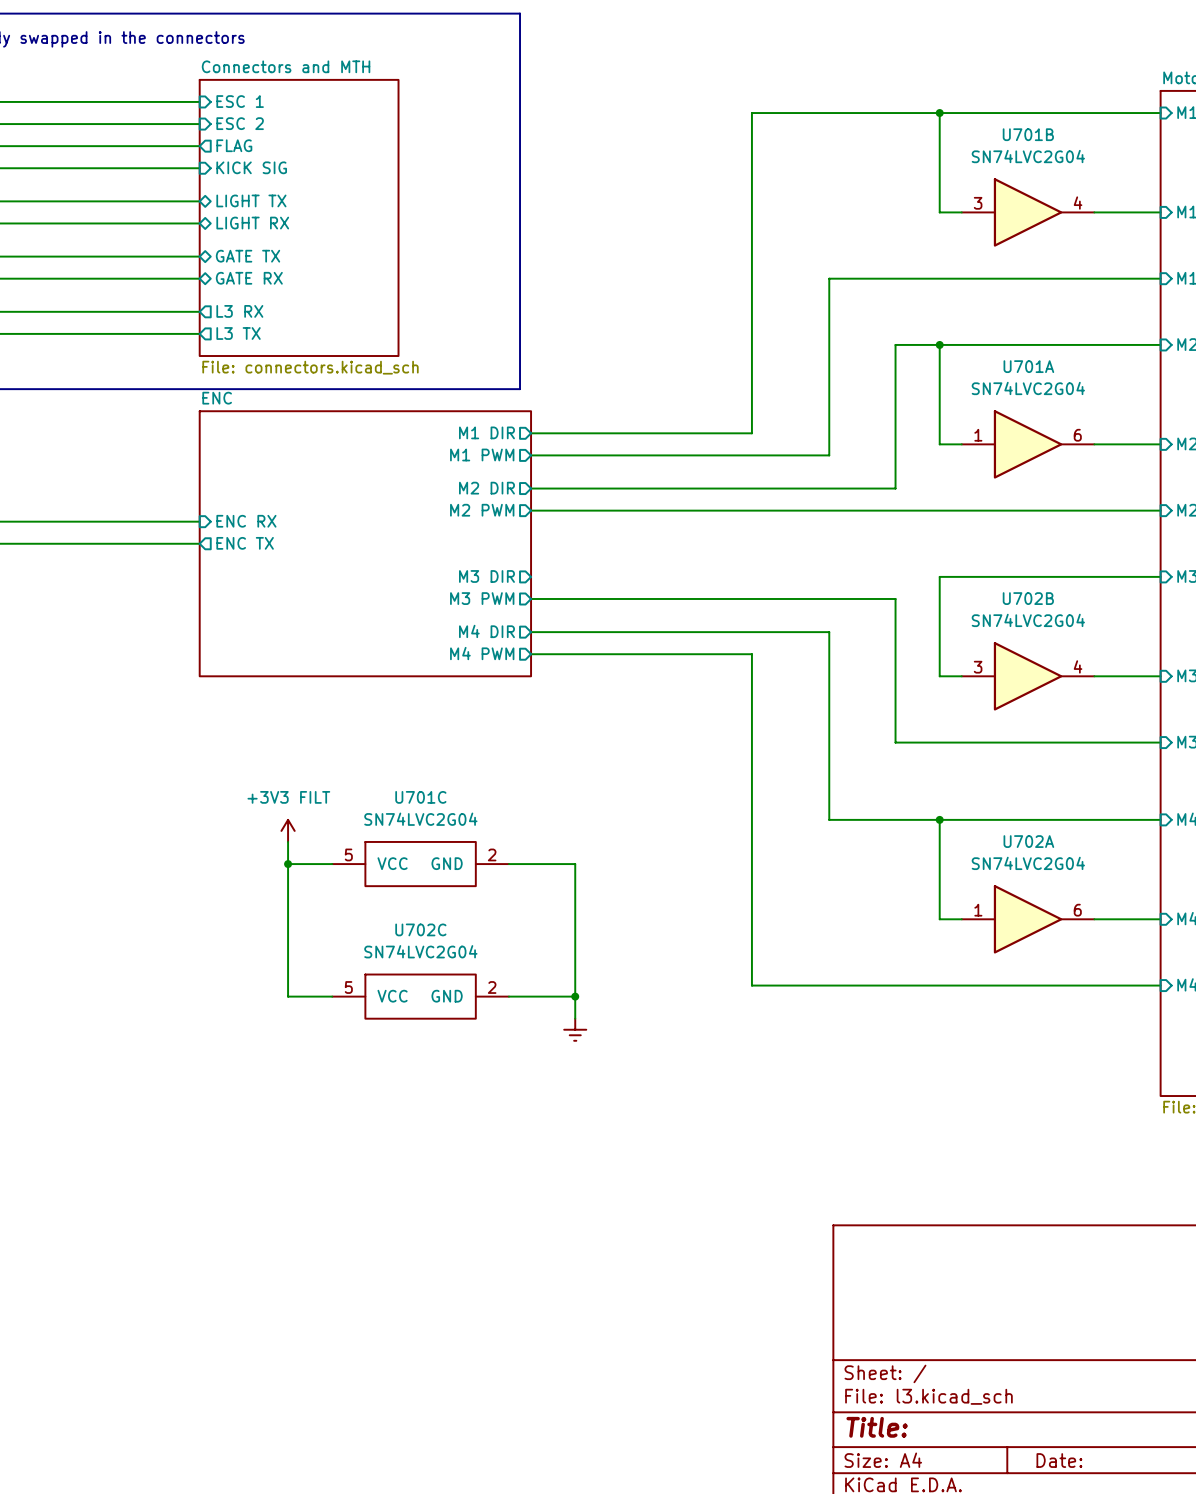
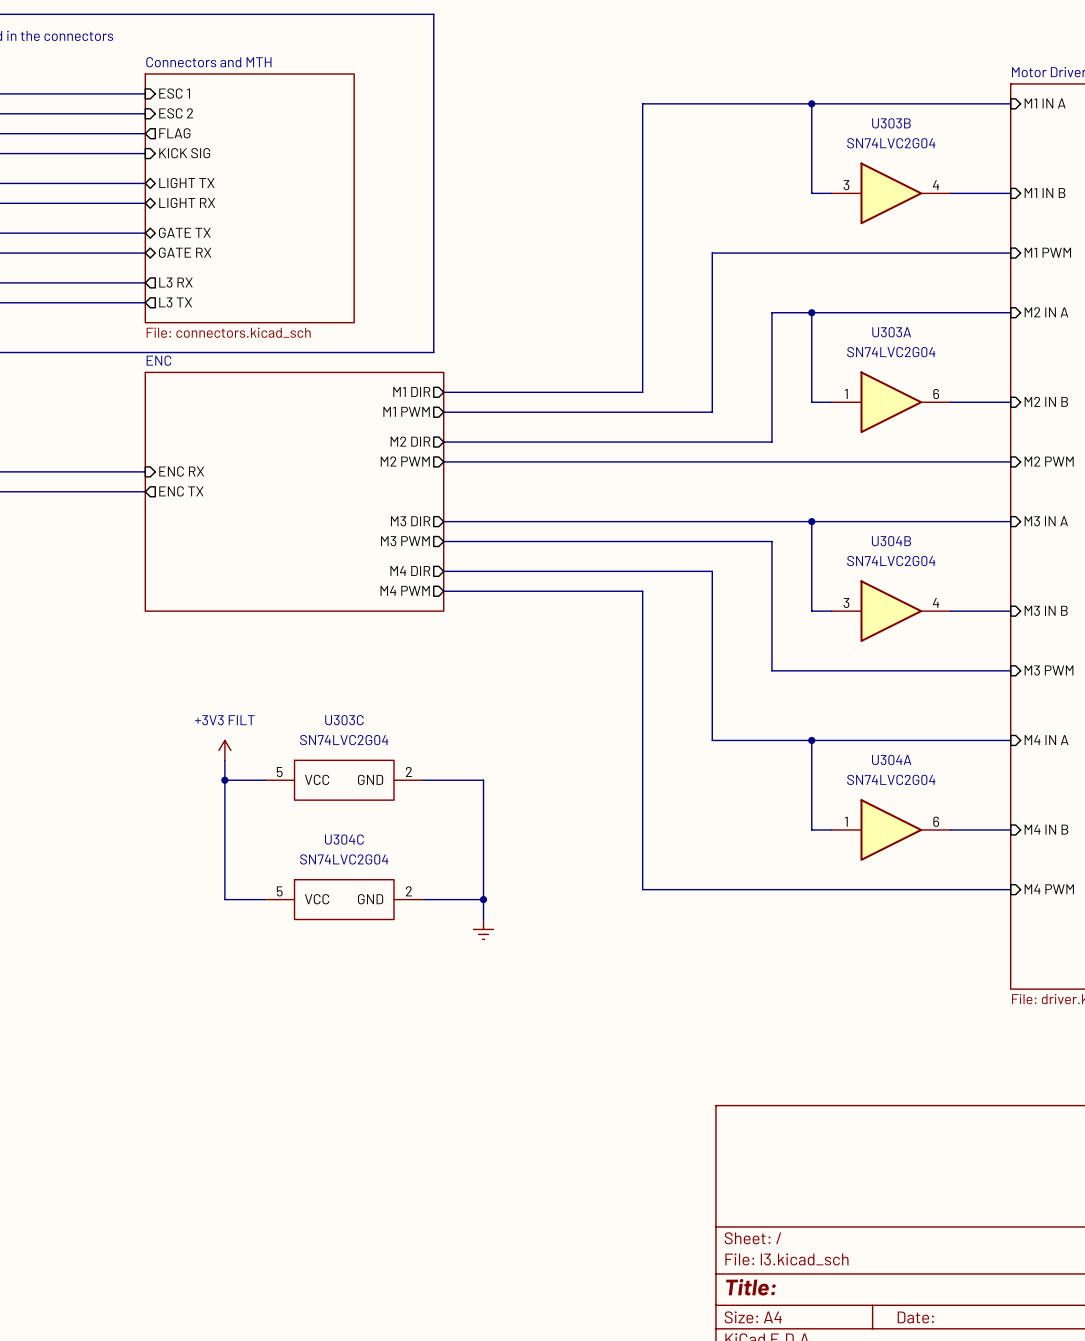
U701B name: U701B (1028, 134) -> U303B (891, 123)
sheet Connectors and MTH: File: connectors.kicad_sch (299, 217) -> none
sheet Connectors and MTH: none -> File: connectors.kicad_sch (249, 198)
U701A name: U701A (1028, 366) -> U303A (891, 332)
wire: none -> (443, 521) (811, 521)
junction: none -> (811, 521)
U702B name: U702B (1028, 598) -> U304B (891, 541)
U701C name: U701C (420, 797) -> U303C (344, 720)
U702A name: U702A (1028, 841) -> U304A (891, 759)
U702C name: U702C (420, 929) -> U304C (344, 839)

